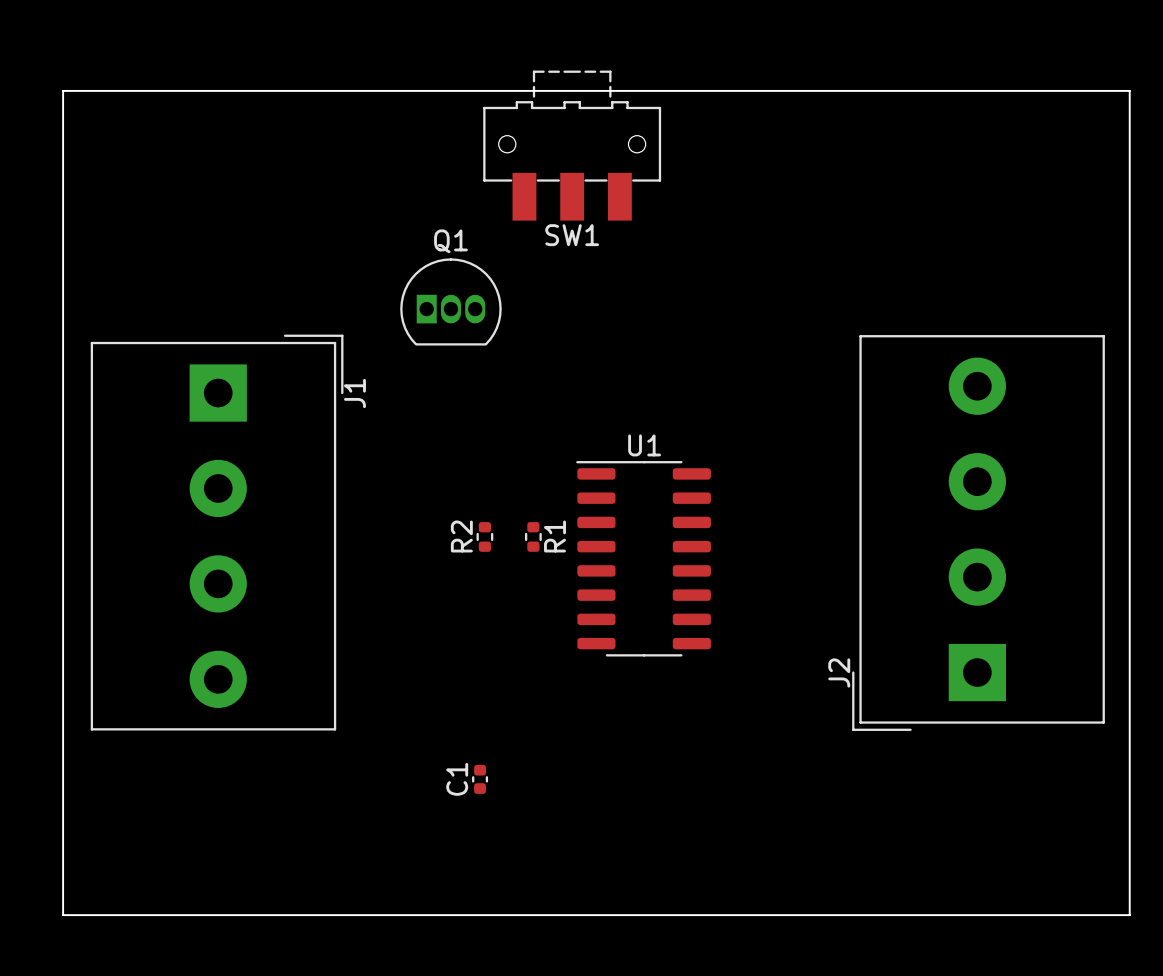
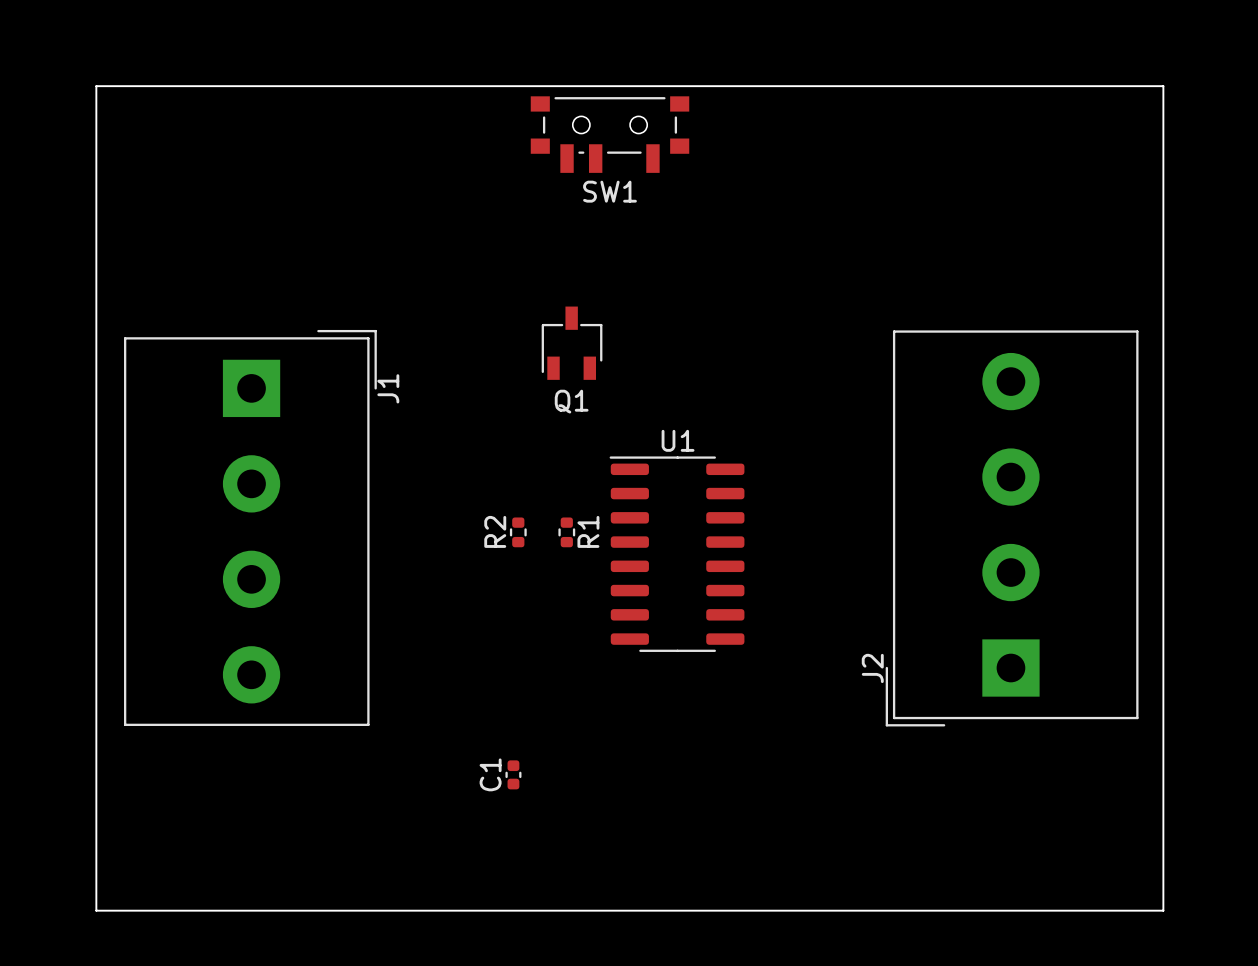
SW1 footprint: [483, 70, 662, 221] -> [530, 96, 690, 173]
Q1 name position: Q1 (450, 241) -> Q1 (571, 401)
Q1 footprint: [400, 258, 502, 346] -> [541, 306, 603, 380]

